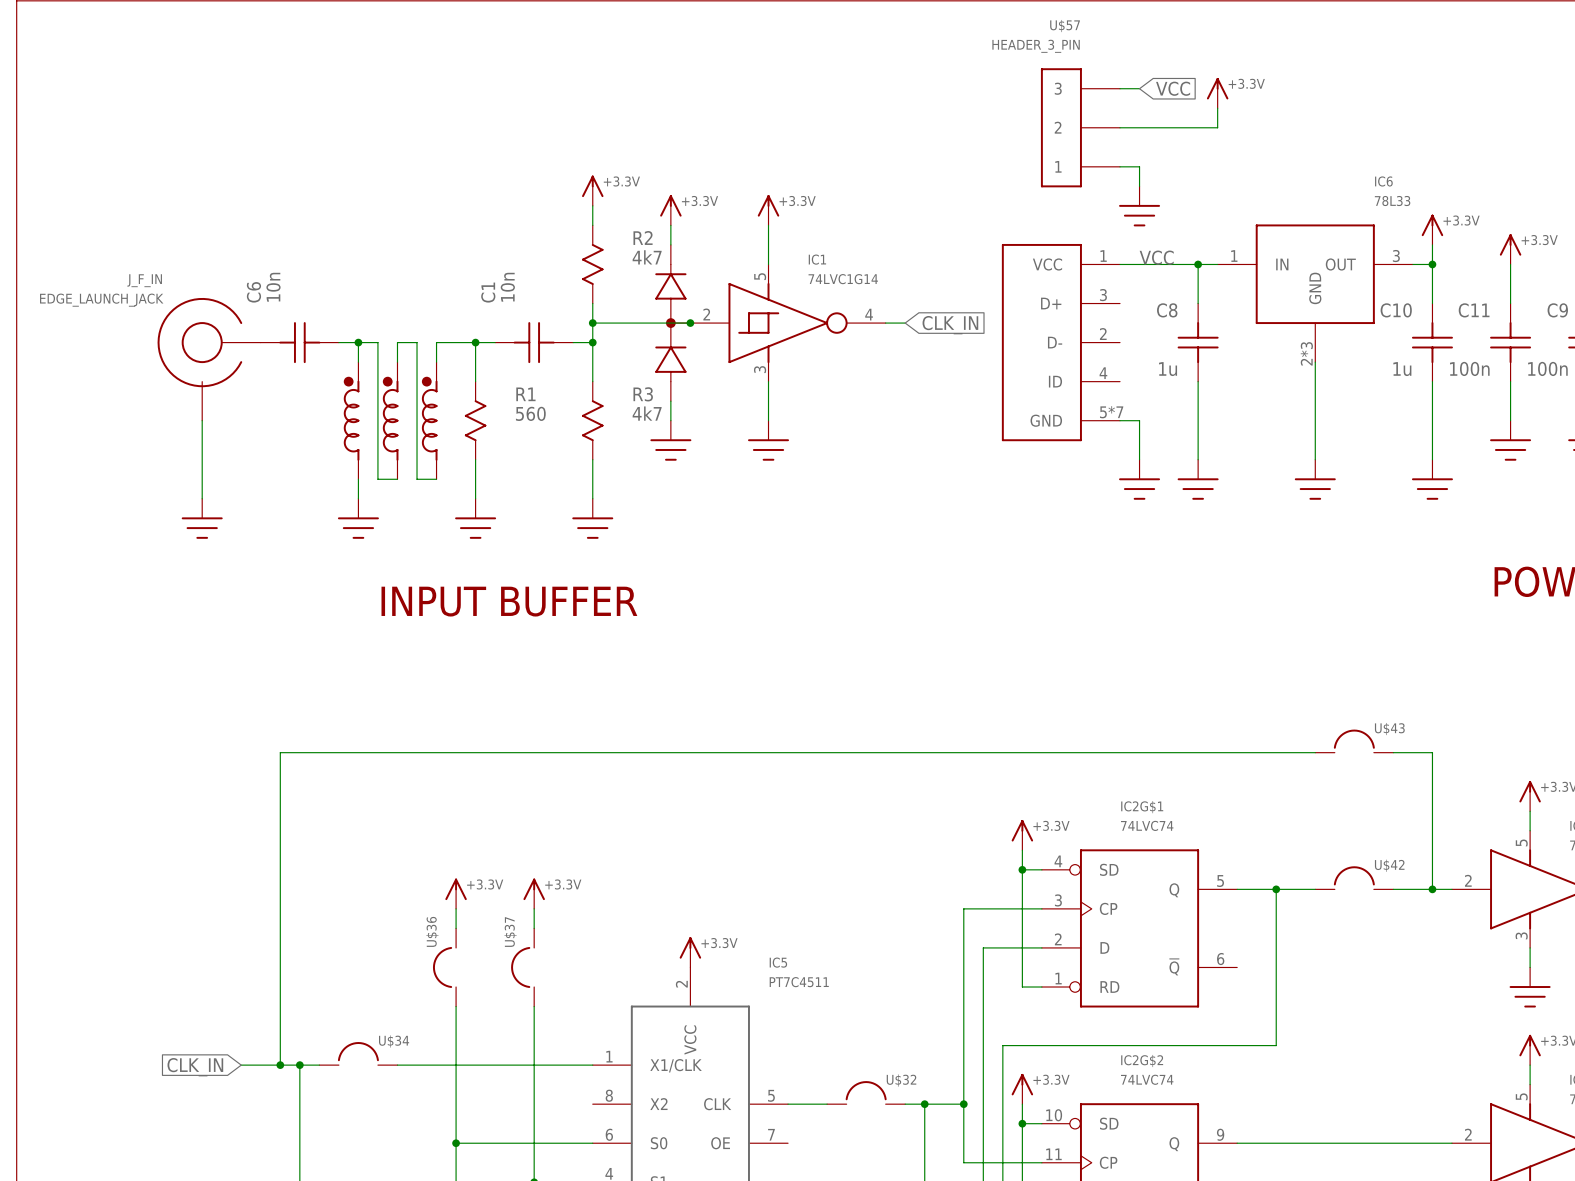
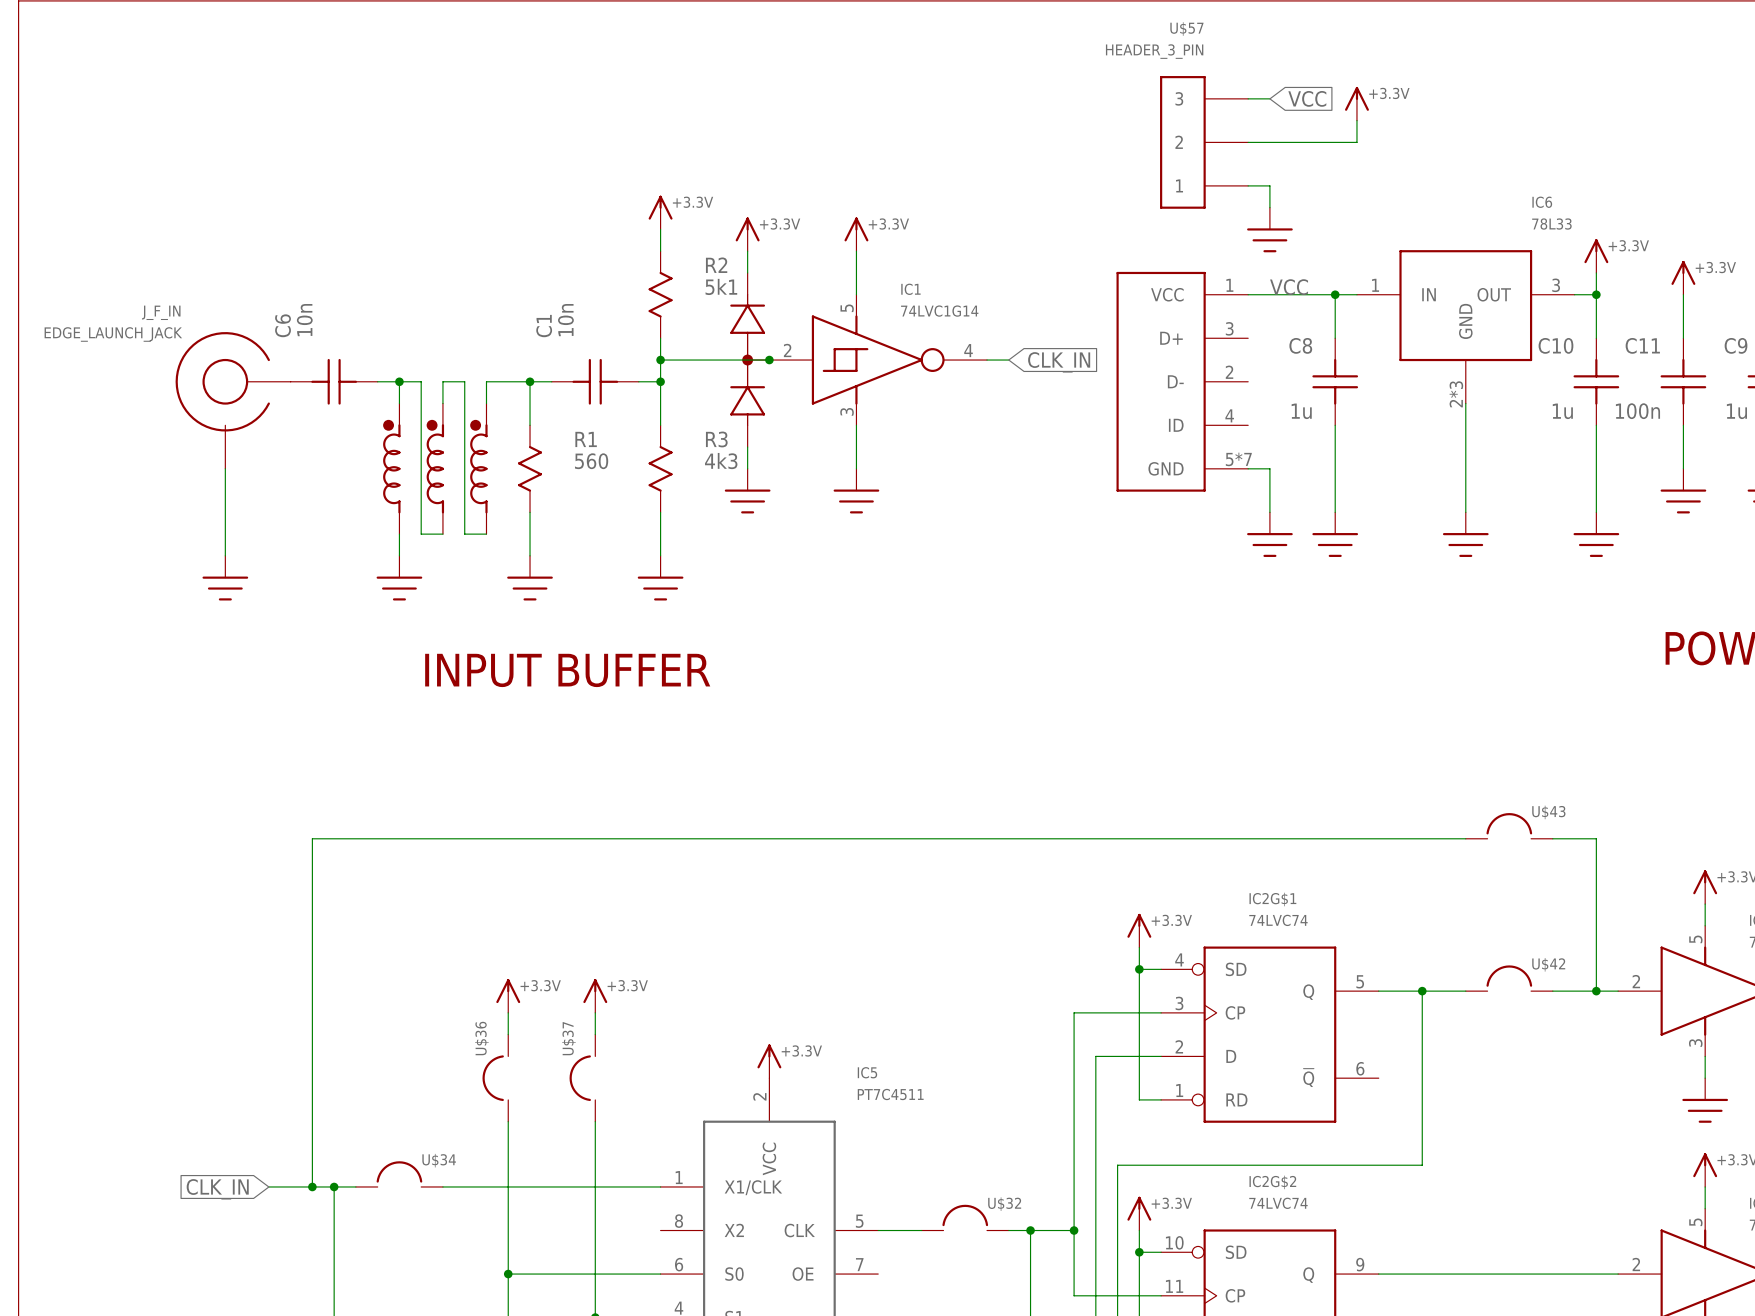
R2 value: 4k7 (647, 257) -> 5k1 (721, 286)
C9 value: 100n (1547, 368) -> 1u (1736, 411)
R3 value: 4k7 (647, 413) -> 4k3 (721, 461)

